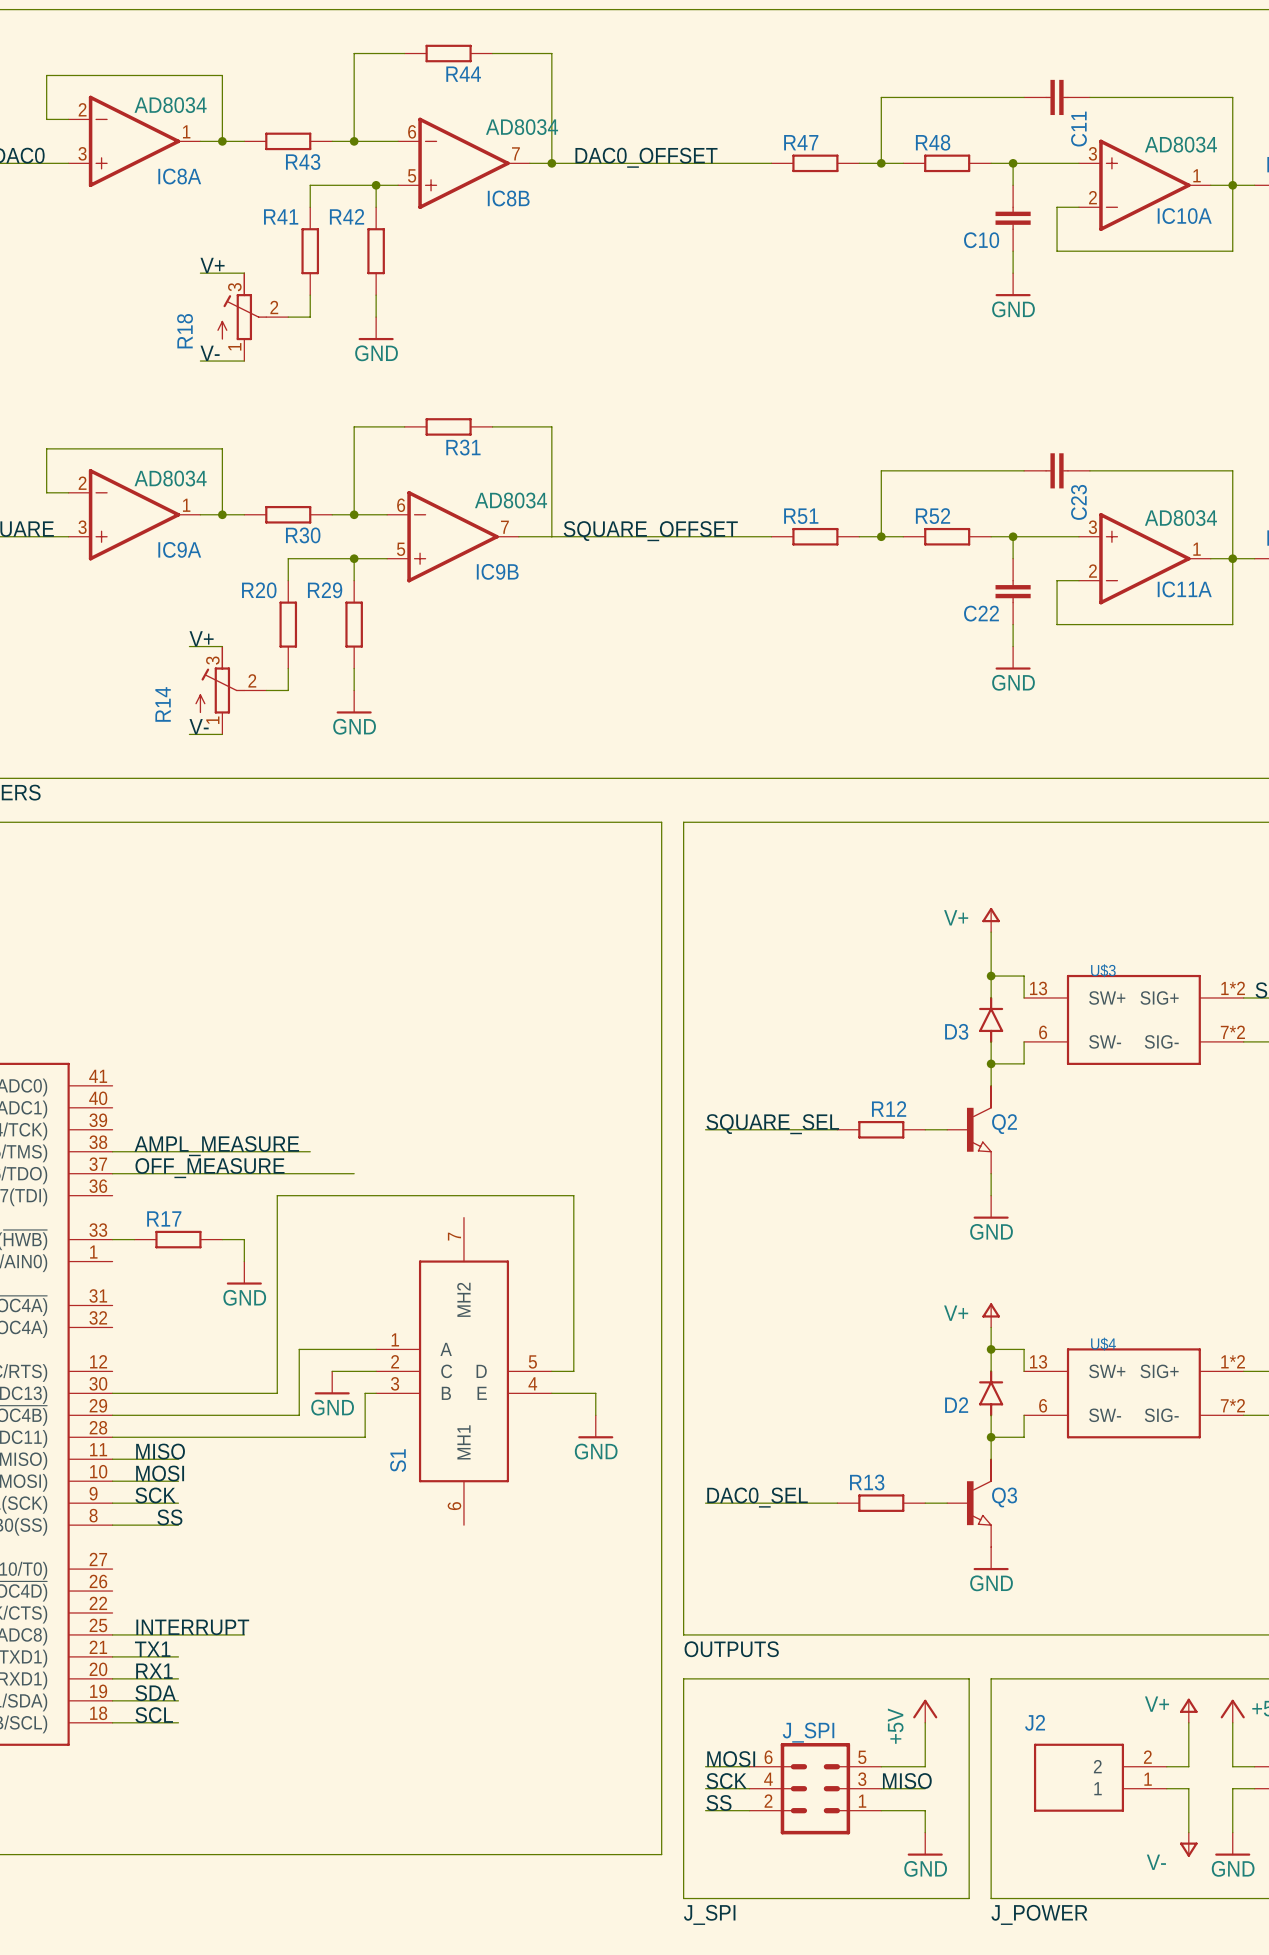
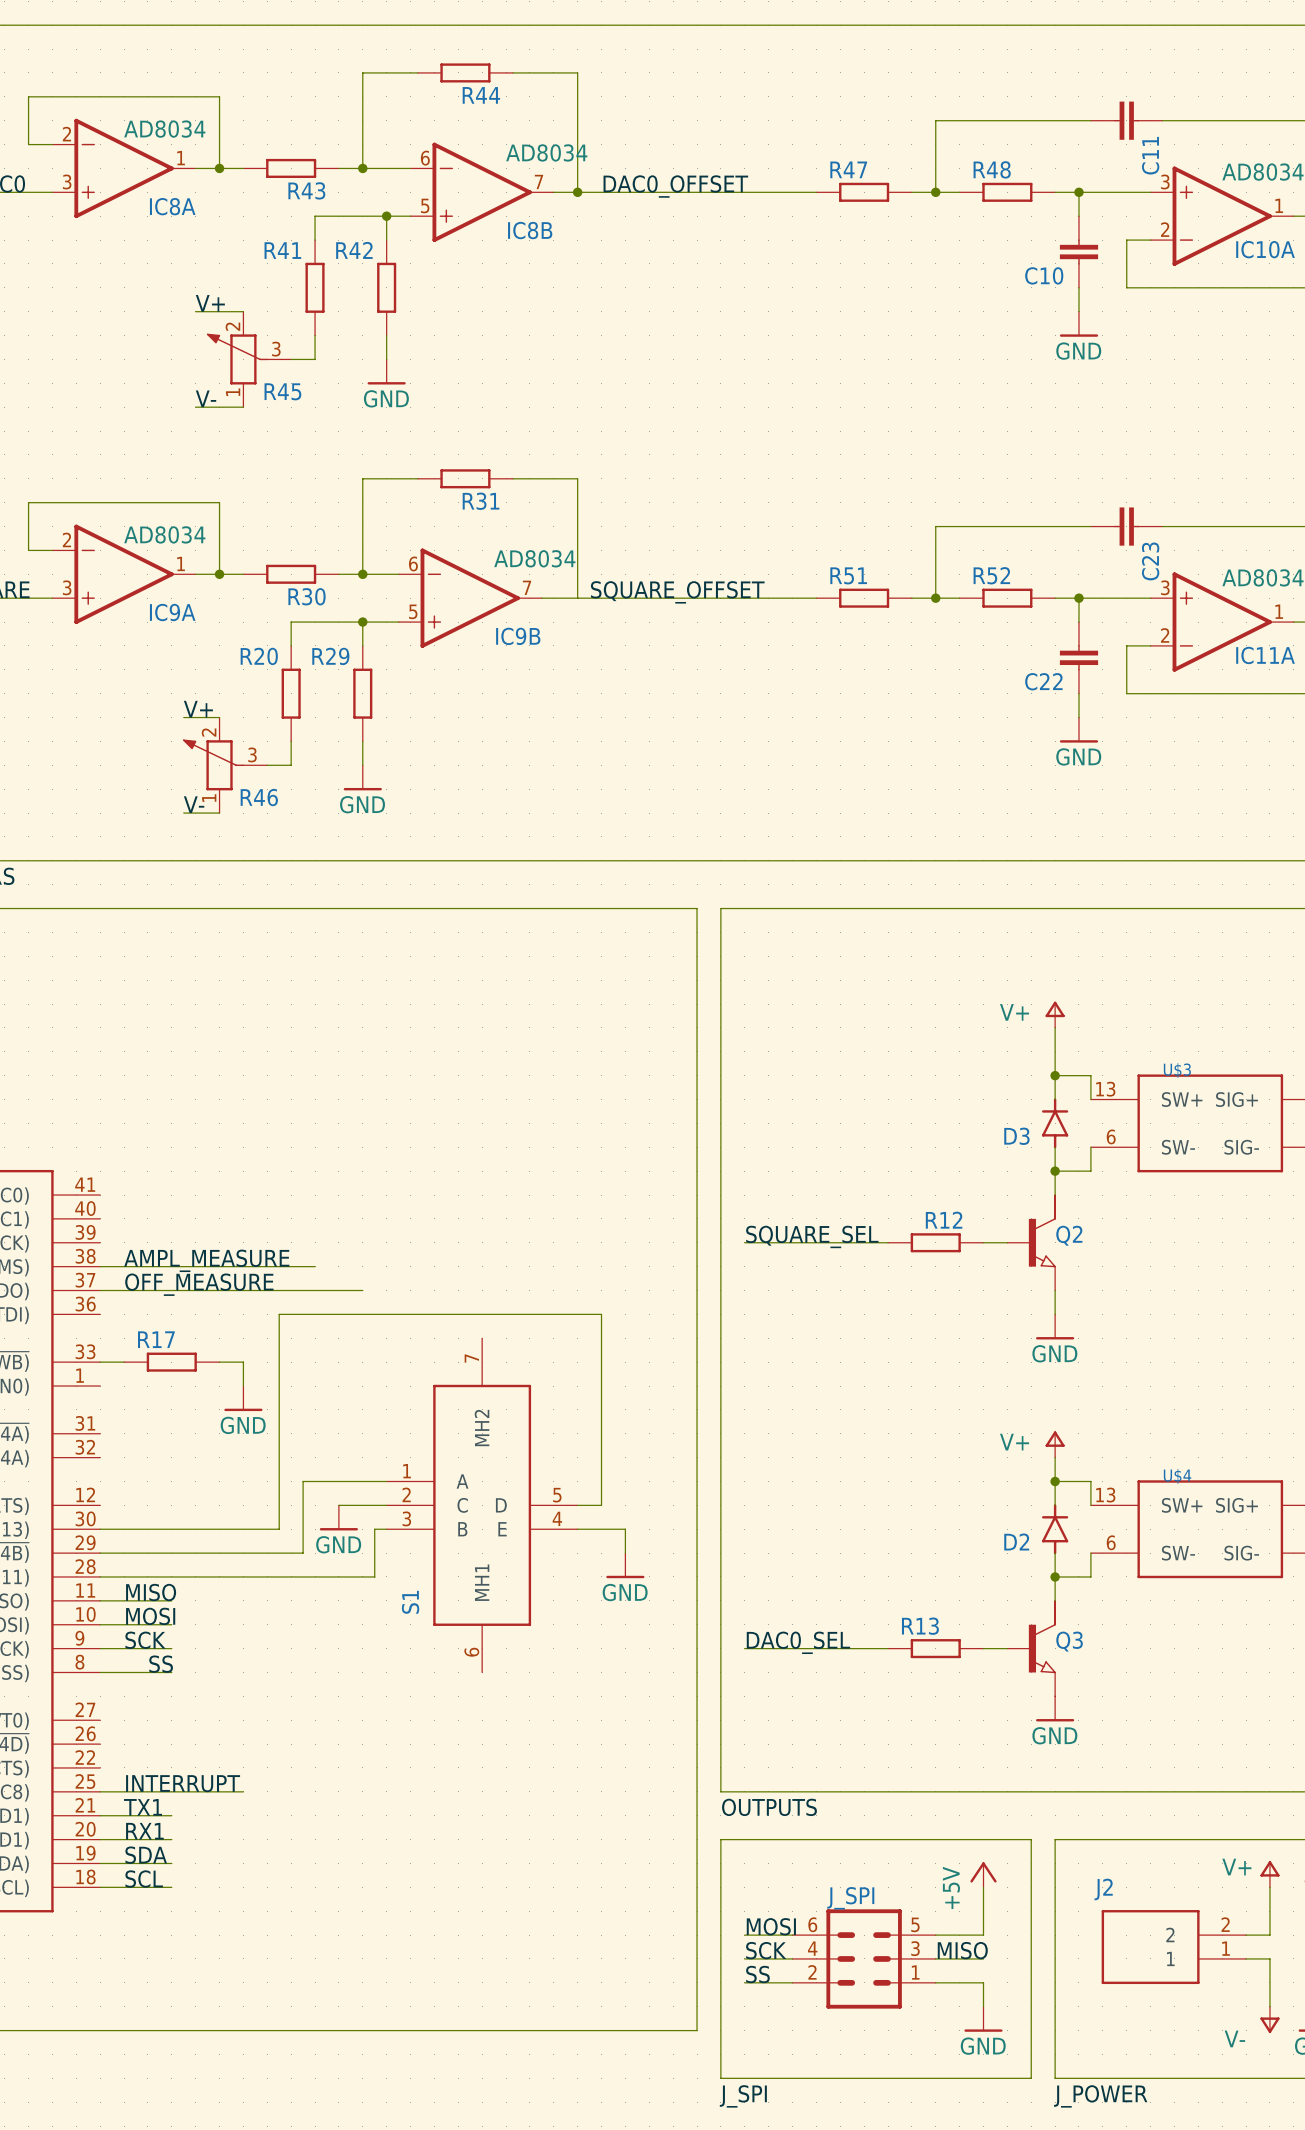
R18: (252, 316) -> none
R45: none -> (249, 359)
R46: none -> (225, 765)
R14: (230, 690) -> none

